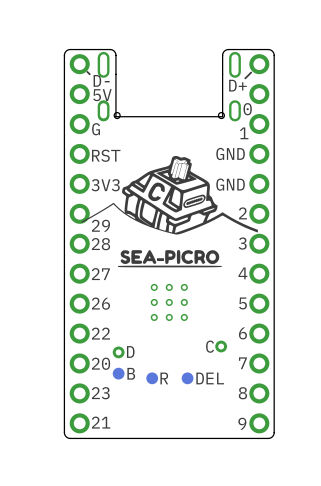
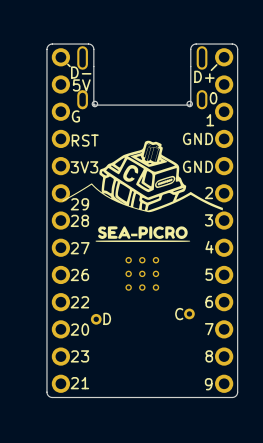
part: (118, 373) -> none
text: B (131, 373) -> none
part: (152, 378) -> none
text: R (164, 378) -> none
part: (187, 378) -> none
text: DEL (210, 378) -> none

